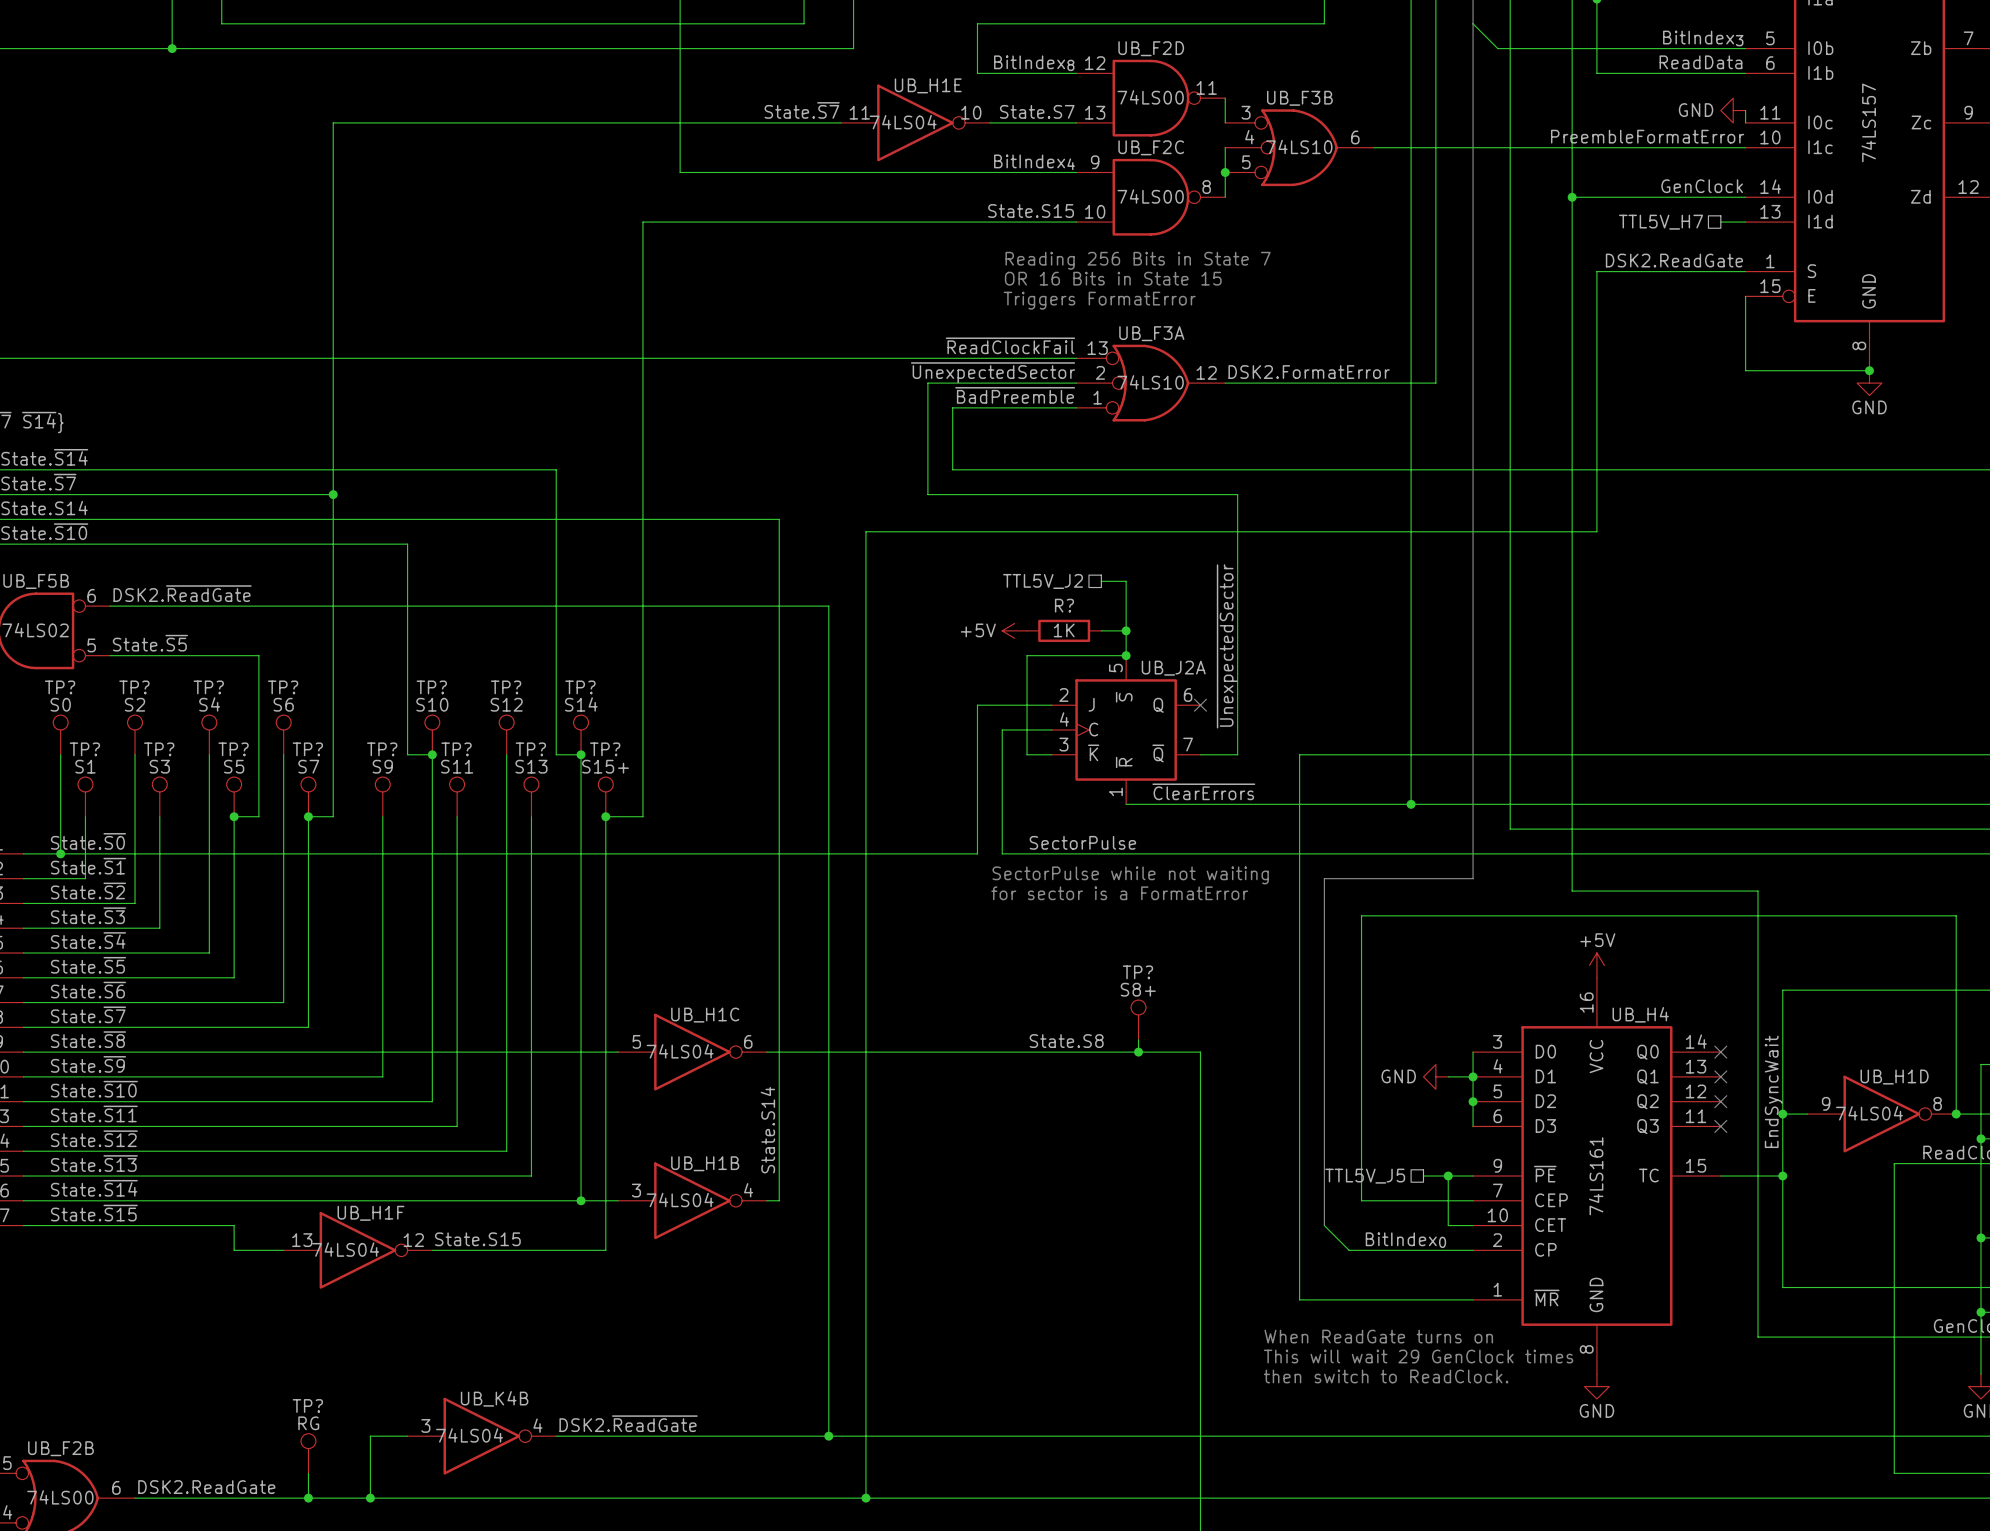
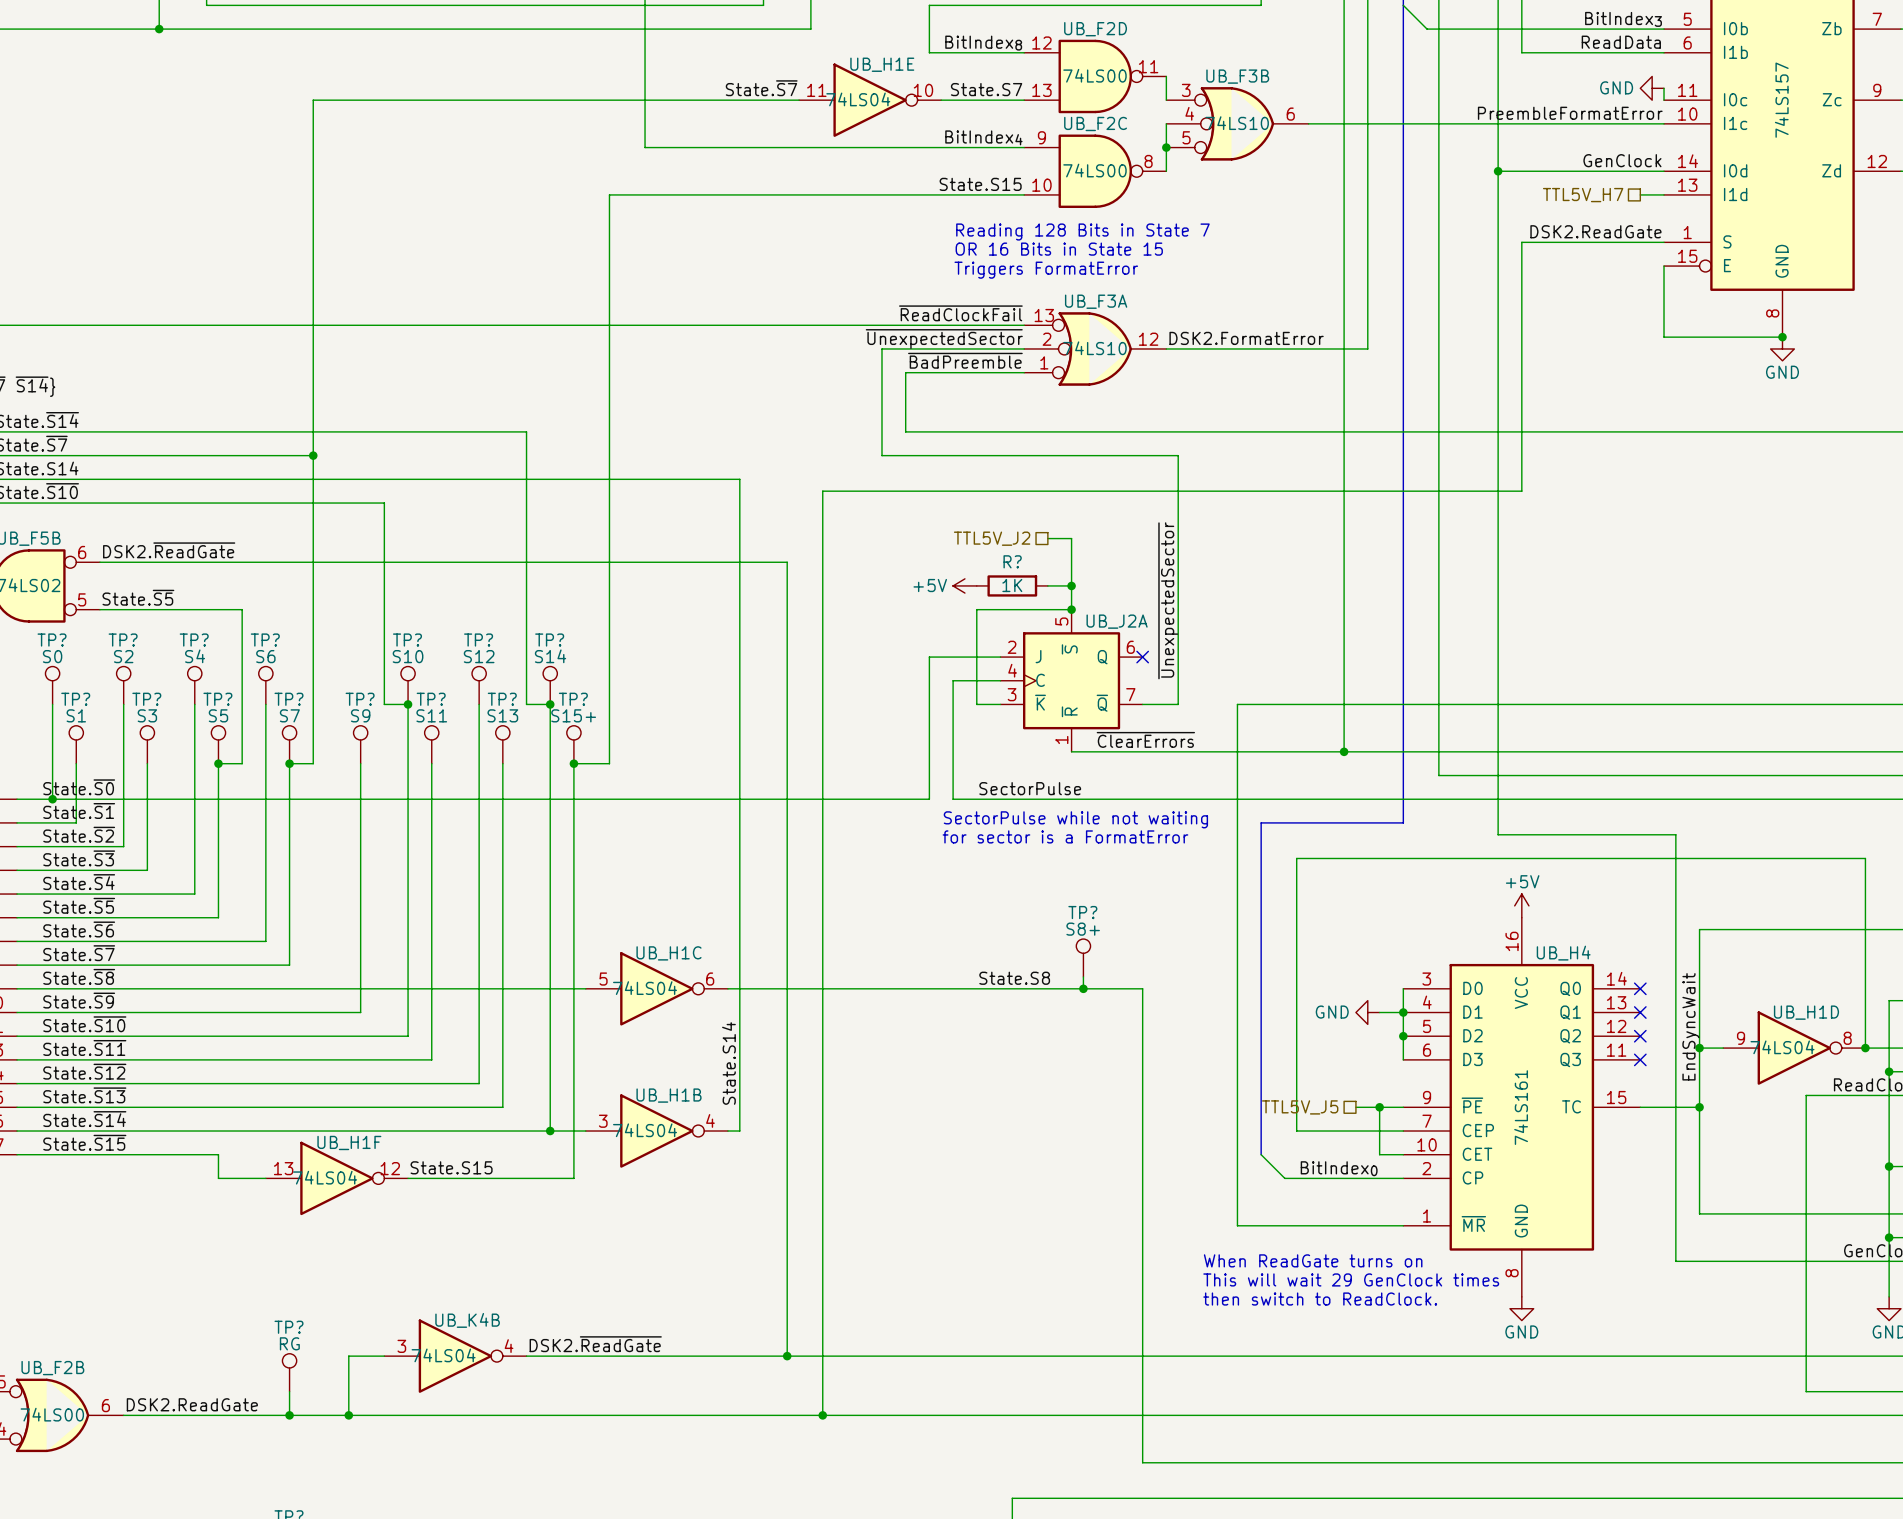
text: Reading 256 Bits in State 7 (1138, 260) -> Reading 128 Bits in State 7 (1082, 232)

